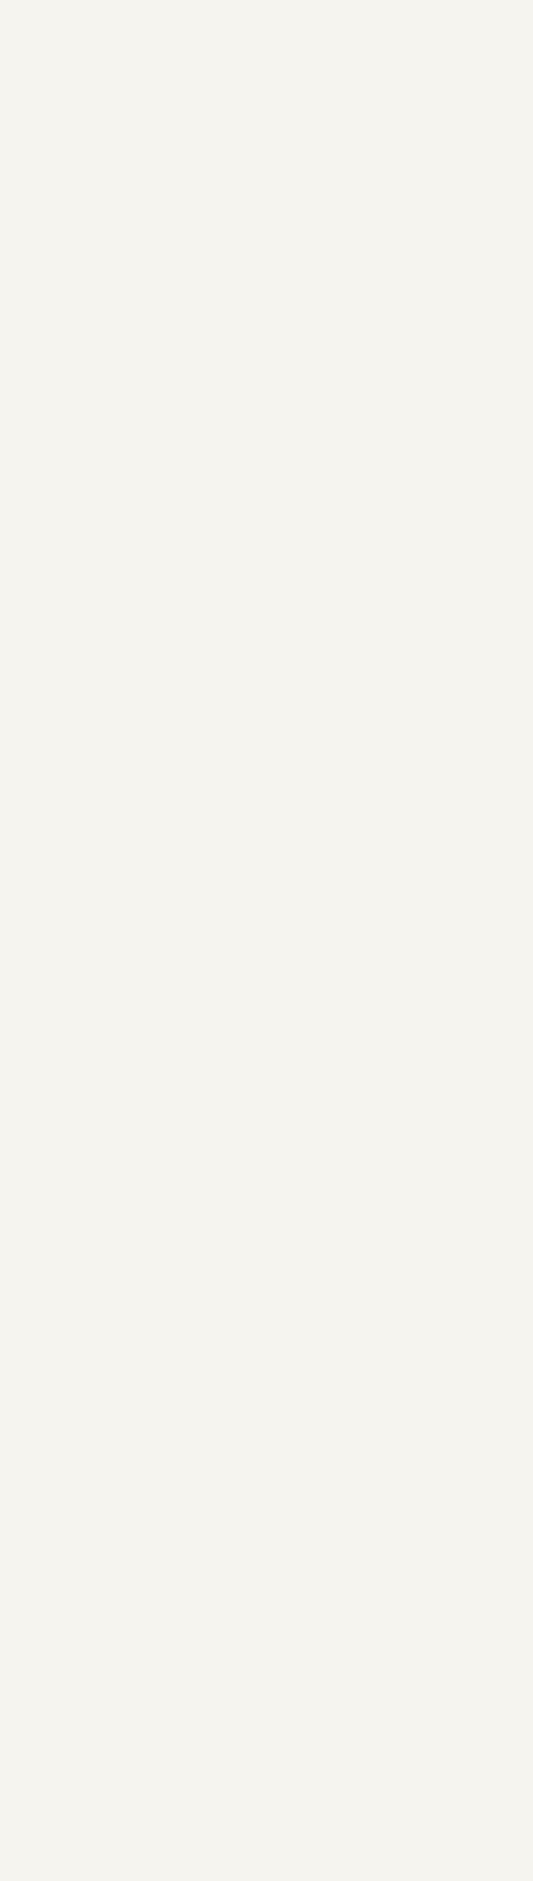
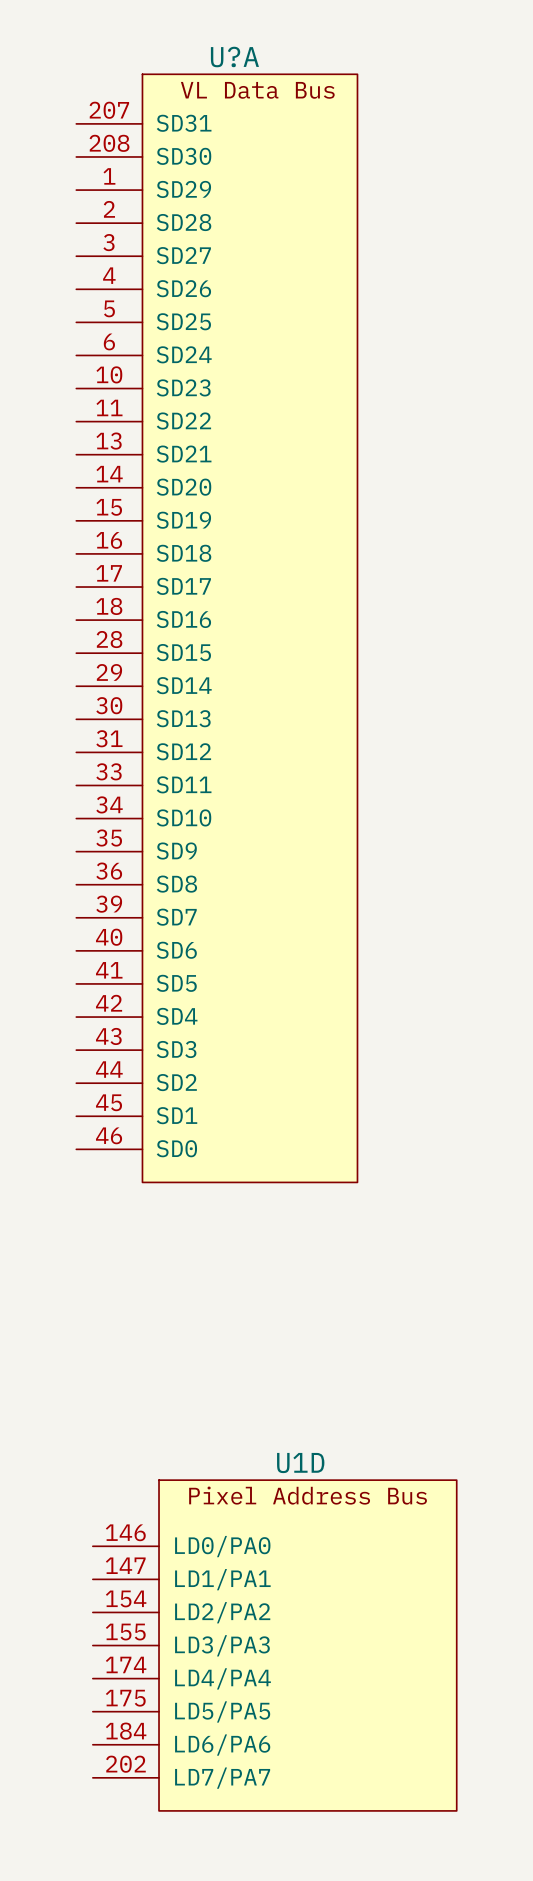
U?A: none -> (216, 628)
U1D: none -> (274, 1645)

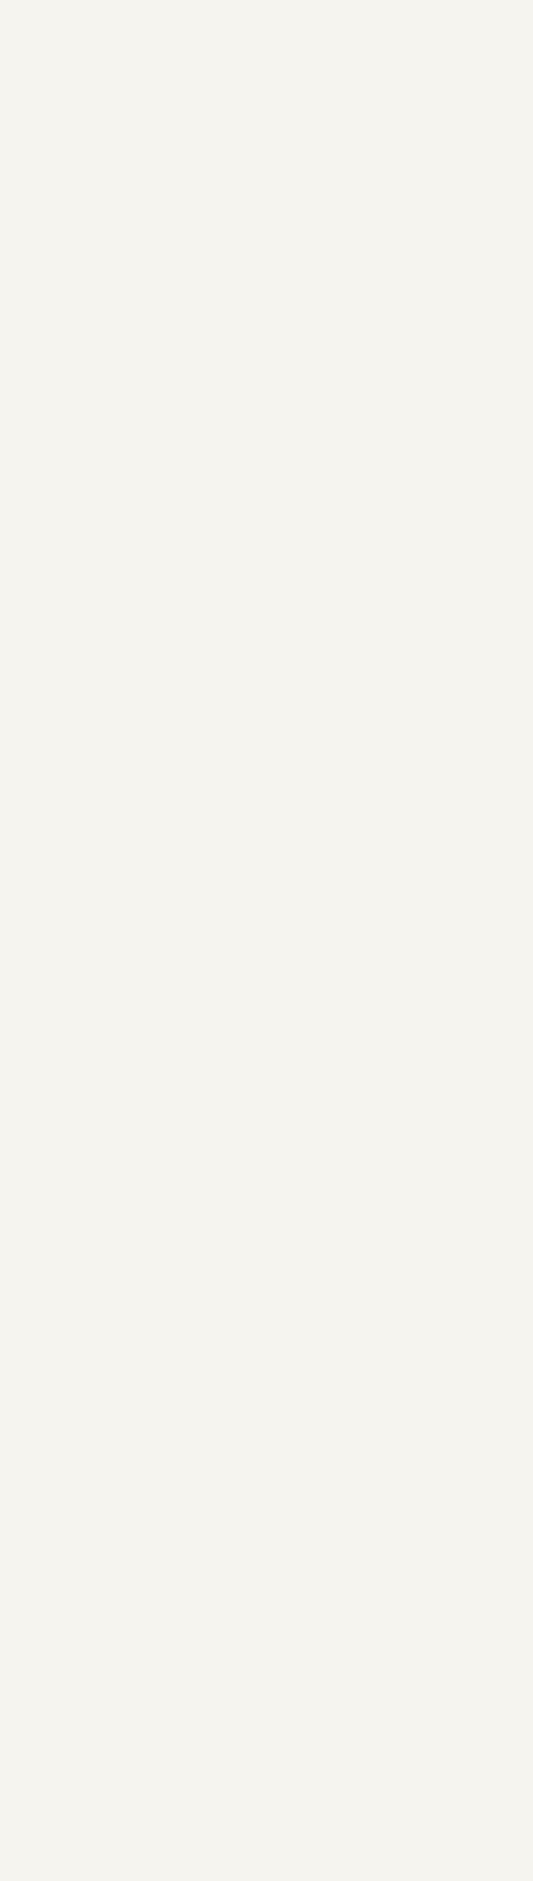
U?A: (216, 628) -> none
U1D: (274, 1645) -> none

